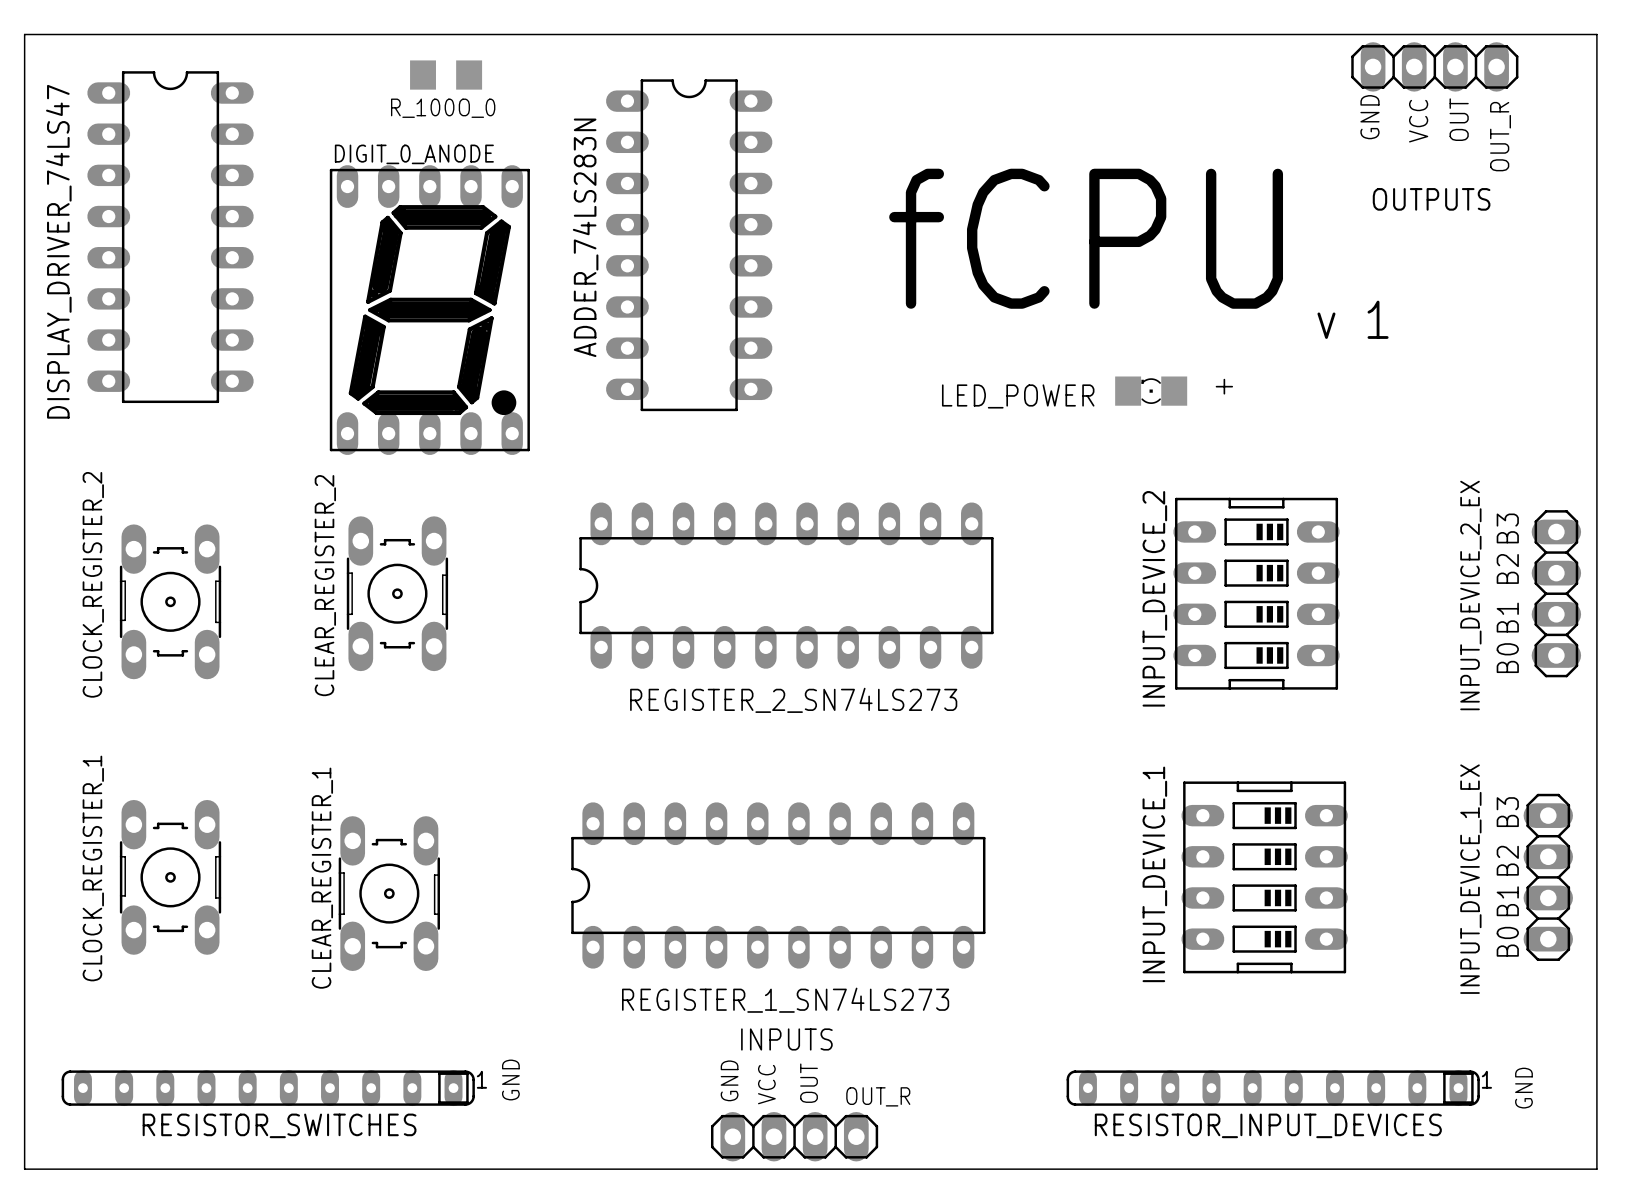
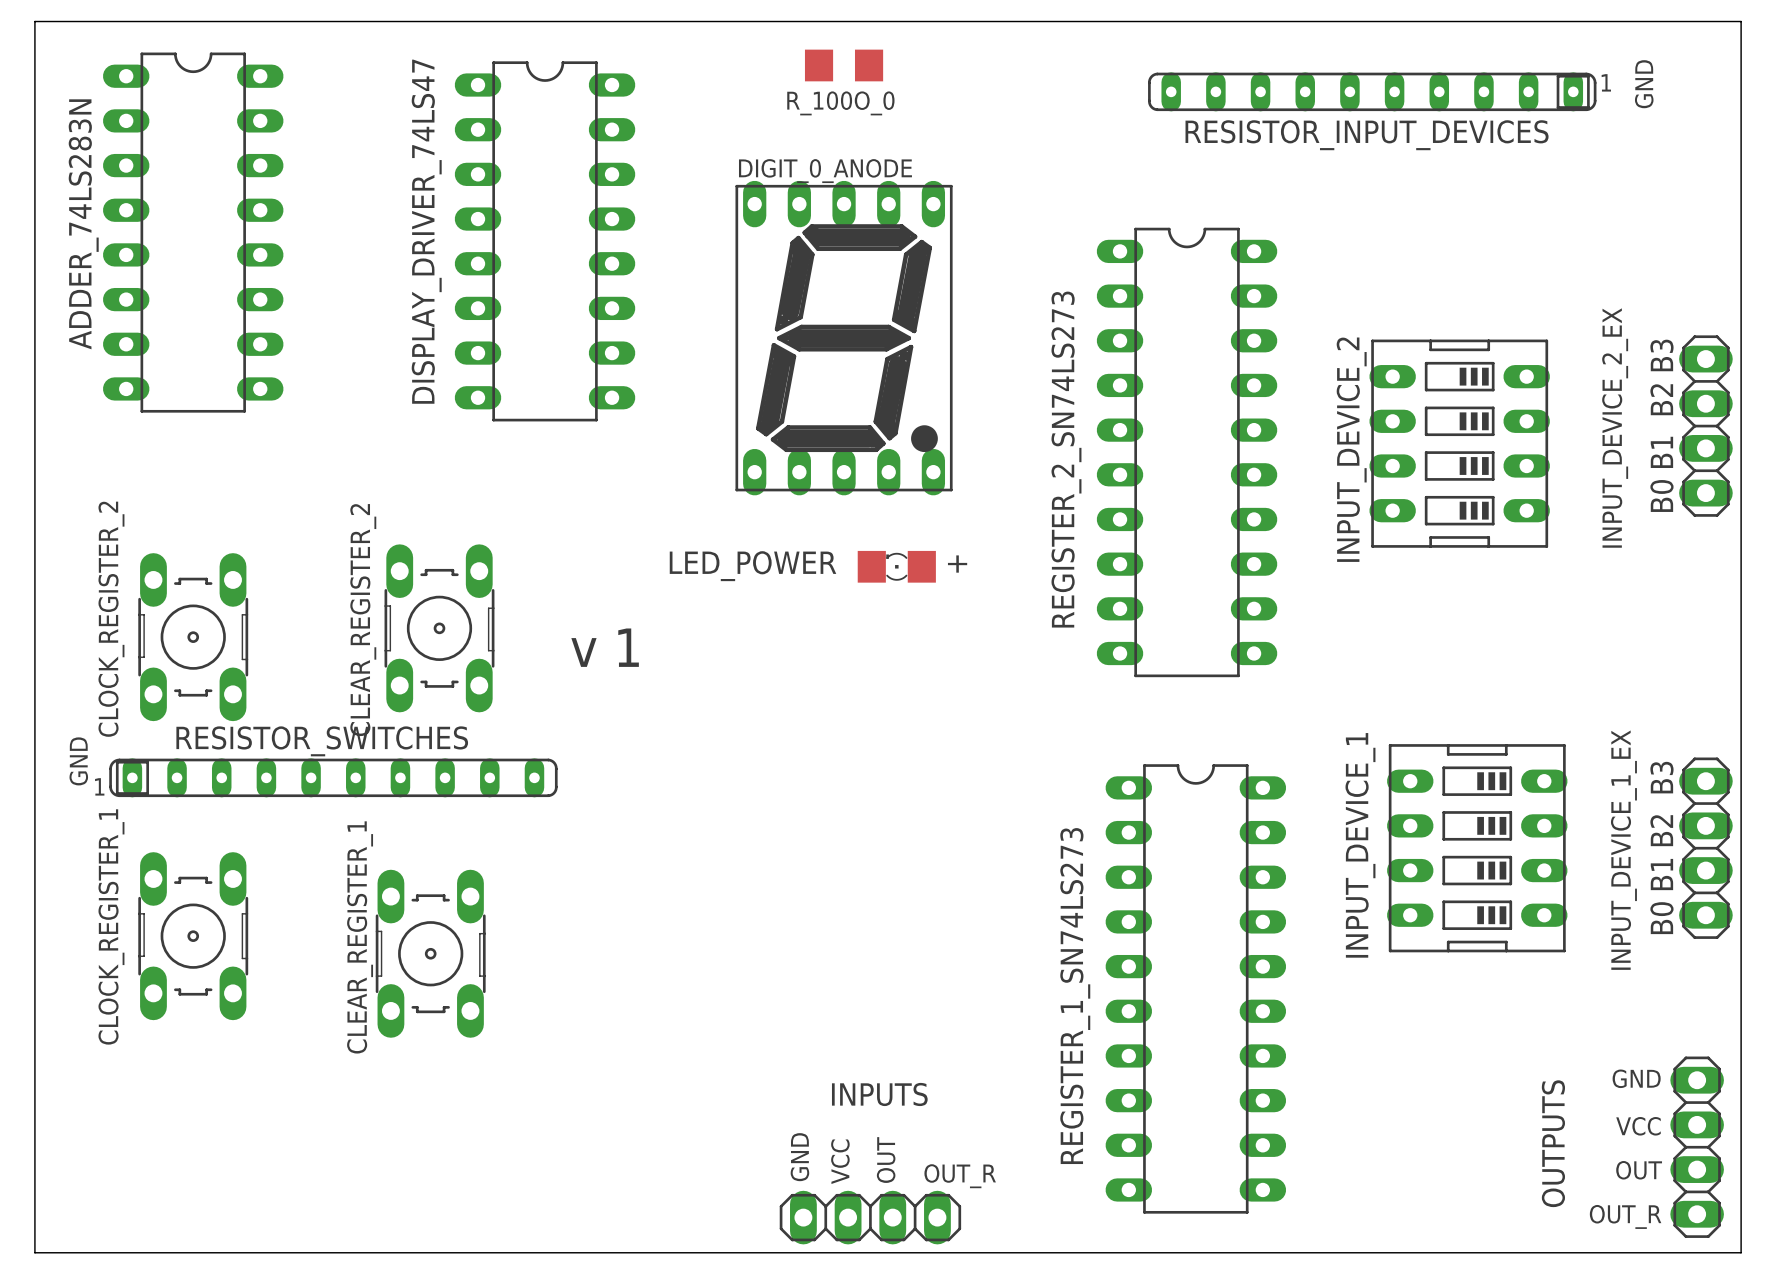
OUTPUTS: (1434, 66) -> none
R_100O_0 position: (446, 75) -> (844, 65)
RESISTOR_INPUT_DEVICES: none -> (1372, 91)
text position: GND (1369, 117) -> GND (1644, 84)
text: OUT (1459, 119) -> none
text: VCC (1418, 121) -> none
text: OUT_R (1500, 136) -> none
DISPLAY_DRIVER_74LS47 position: (170, 237) -> (545, 241)
text: fCPU (1086, 238) -> none
ADDER_74LS283N position: (689, 245) -> (193, 232)
DISPLAY_DRIVER_74LS47 name position: DISPLAY_DRIVER_74LS47 (58, 251) -> DISPLAY_DRIVER_74LS47 (426, 231)
DIGIT_0_ANODE position: (429, 310) -> (844, 338)
text: v 1 (1353, 319) -> none
text: none -> B3 (1661, 355)
text: none -> B2 (1661, 399)
text position: + (1224, 386) -> + (957, 564)
LED_POWER position: (1151, 391) -> (896, 566)
LED_POWER name position: LED_POWER (1018, 396) -> LED_POWER (753, 566)
text: none -> B1 (1661, 452)
text: none -> B0 (1661, 495)
text: B3 (1507, 528) -> none
text: B2 (1507, 568) -> none
REGISTER_2_SN74LS273 rotation: 0° (786, 585) -> 90° clockwise (1187, 452)
REGISTER_2_SN74LS273 position: (786, 585) -> (1187, 452)
INPUT_DEVICE_2 position: (1256, 593) -> (1459, 443)
INPUT_DEVICE_2_EX position: (1556, 593) -> (1705, 426)
text: none -> v 1 (605, 647)
text: B1 (1507, 617) -> none
text: B0 (1507, 658) -> none
text: none -> GND (78, 761)
RESISTOR_SWITCHES: none -> (333, 777)
text position: B3 (1507, 812) -> B3 (1661, 777)
text position: B2 (1507, 860) -> B2 (1661, 830)
INPUT_DEVICE_1 position: (1264, 877) -> (1477, 848)
INPUT_DEVICE_1_EX position: (1548, 877) -> (1705, 848)
REGISTER_1_SN74LS273 rotation: 0° (778, 885) -> 90° clockwise (1195, 988)
REGISTER_1_SN74LS273 position: (778, 885) -> (1195, 988)
text position: B1 (1507, 901) -> B1 (1661, 874)
text position: B0 (1507, 941) -> B0 (1661, 918)
text position: INPUTS (786, 1039) -> INPUTS (879, 1094)
text: none -> VCC (1638, 1126)
OUTPUTS: none -> (1697, 1147)
text: GND (510, 1080) -> none
RESISTOR_SWITCHES: (268, 1088) -> none
RESISTOR_INPUT_DEVICES: (1273, 1088) -> none
text rotation: 0° (1523, 1088) -> 90° clockwise (1636, 1078)
text position: GND (1523, 1088) -> GND (1636, 1078)
text: none -> OUT (1639, 1170)
text: none -> OUT_R (1625, 1216)

